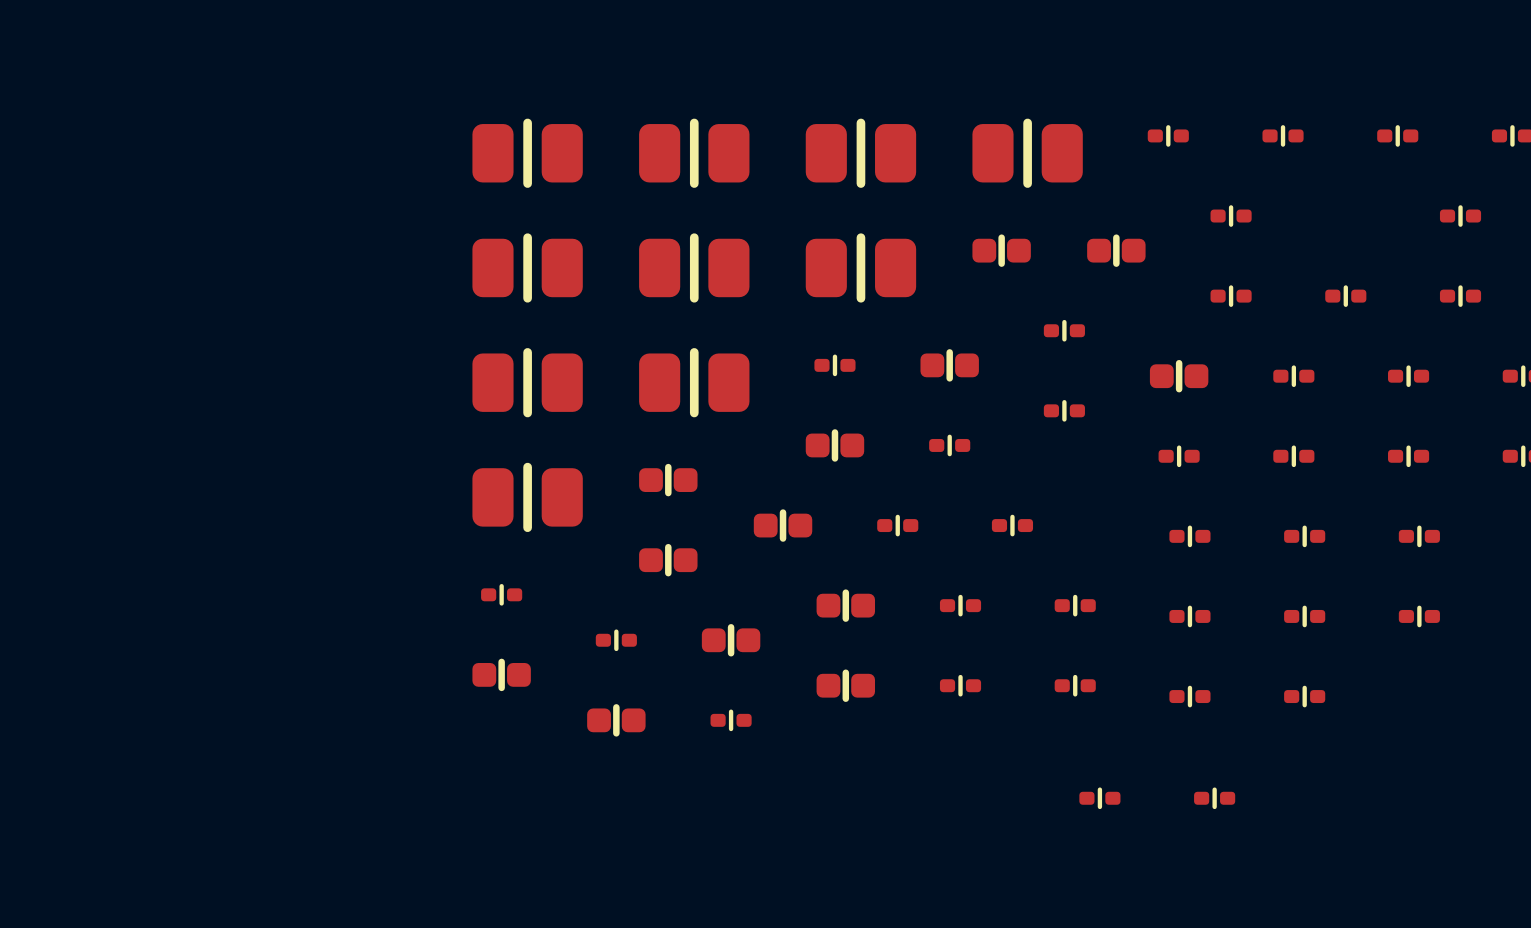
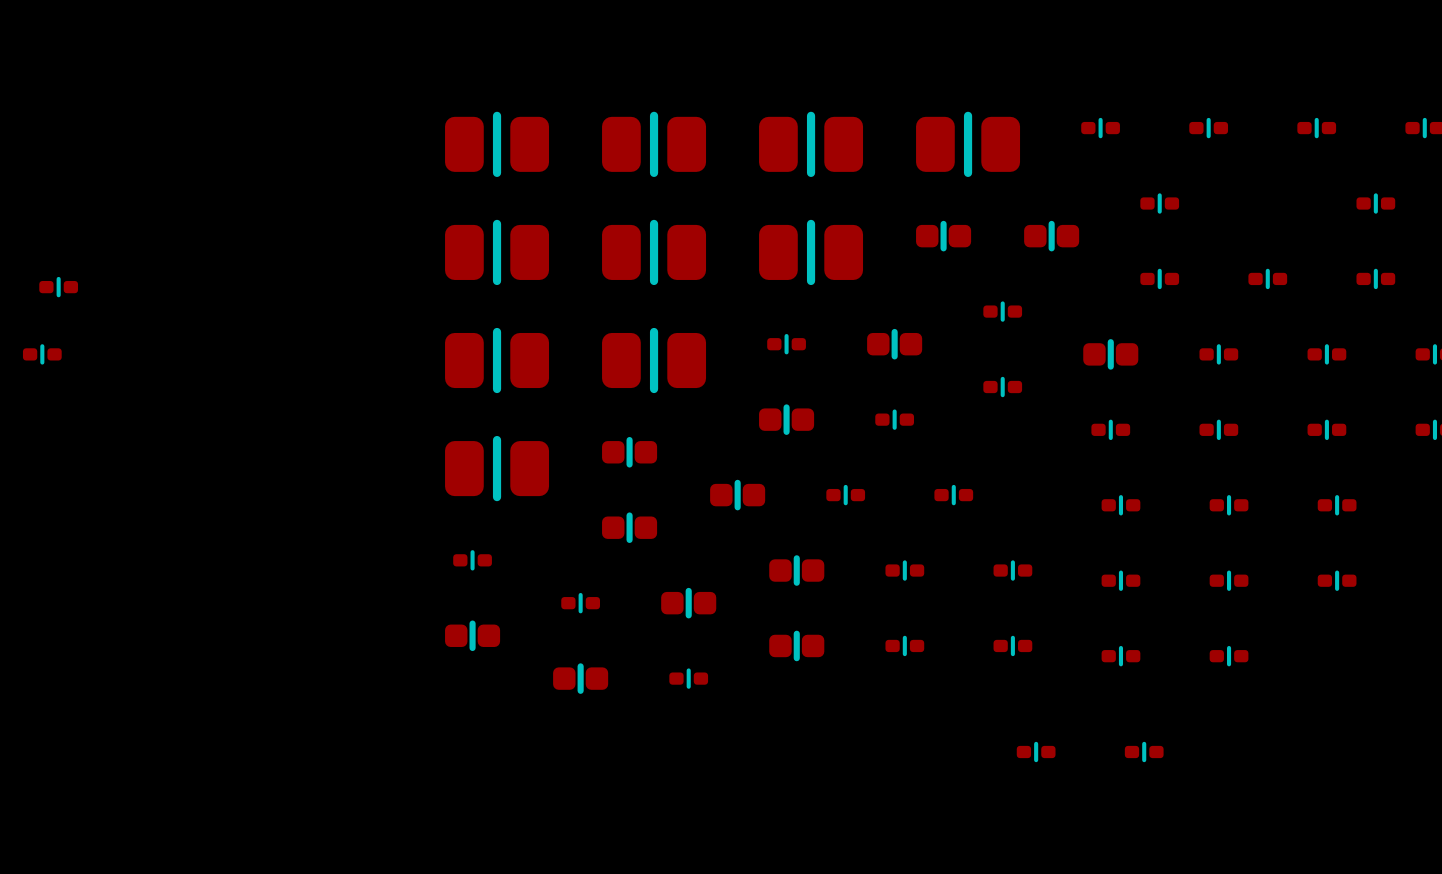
part: none -> (58, 287)
part: none -> (42, 354)

